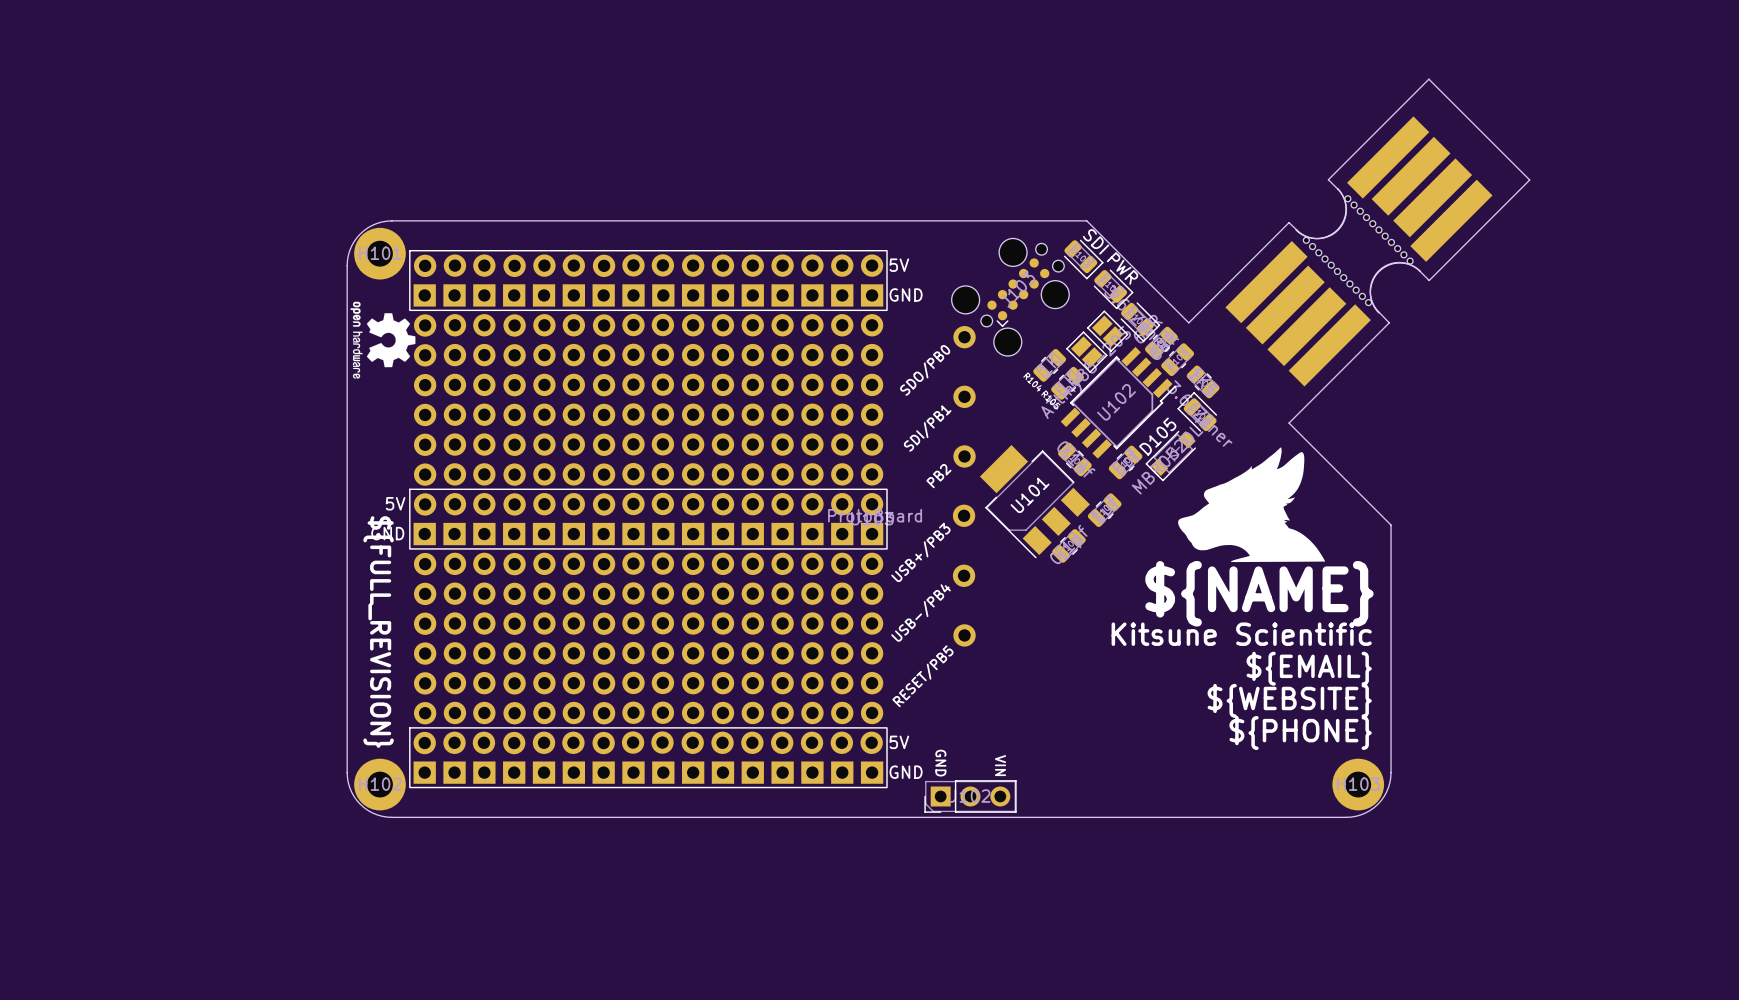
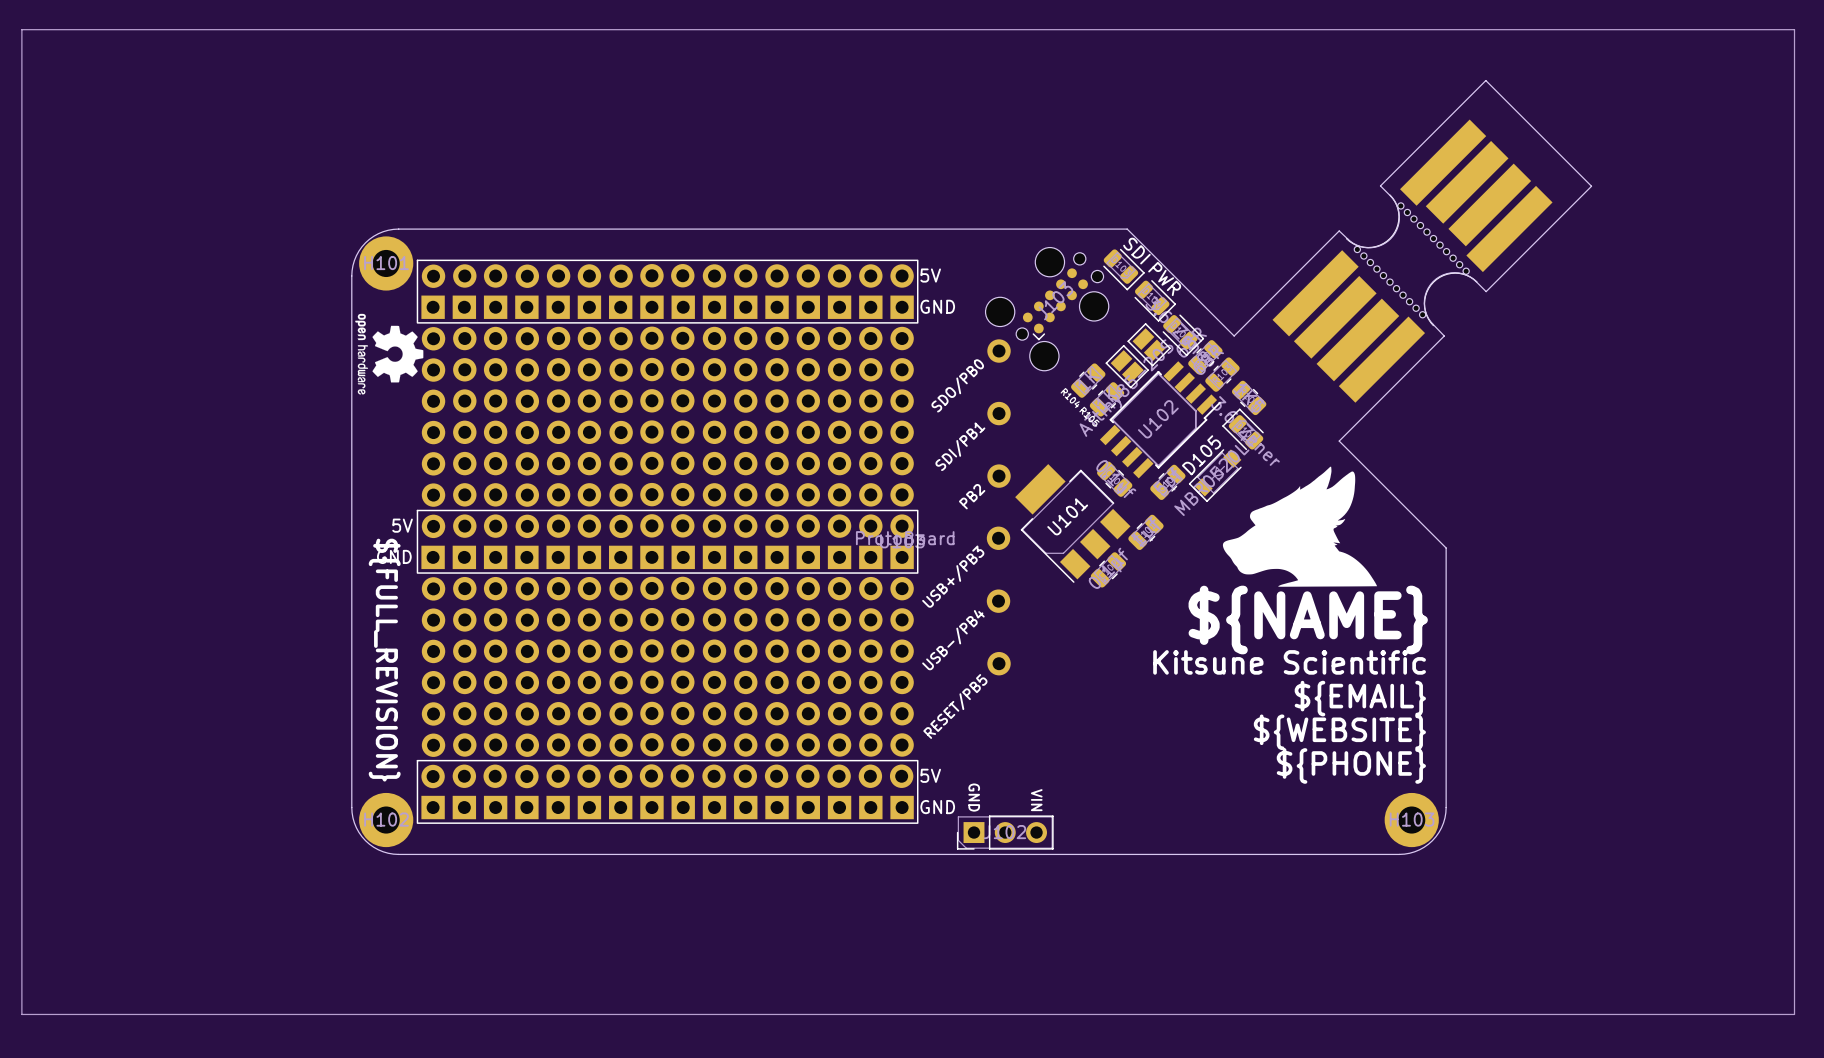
line: none -> (21, 29) (1794, 29) (1794, 1014) (21, 1014) (21, 29)

